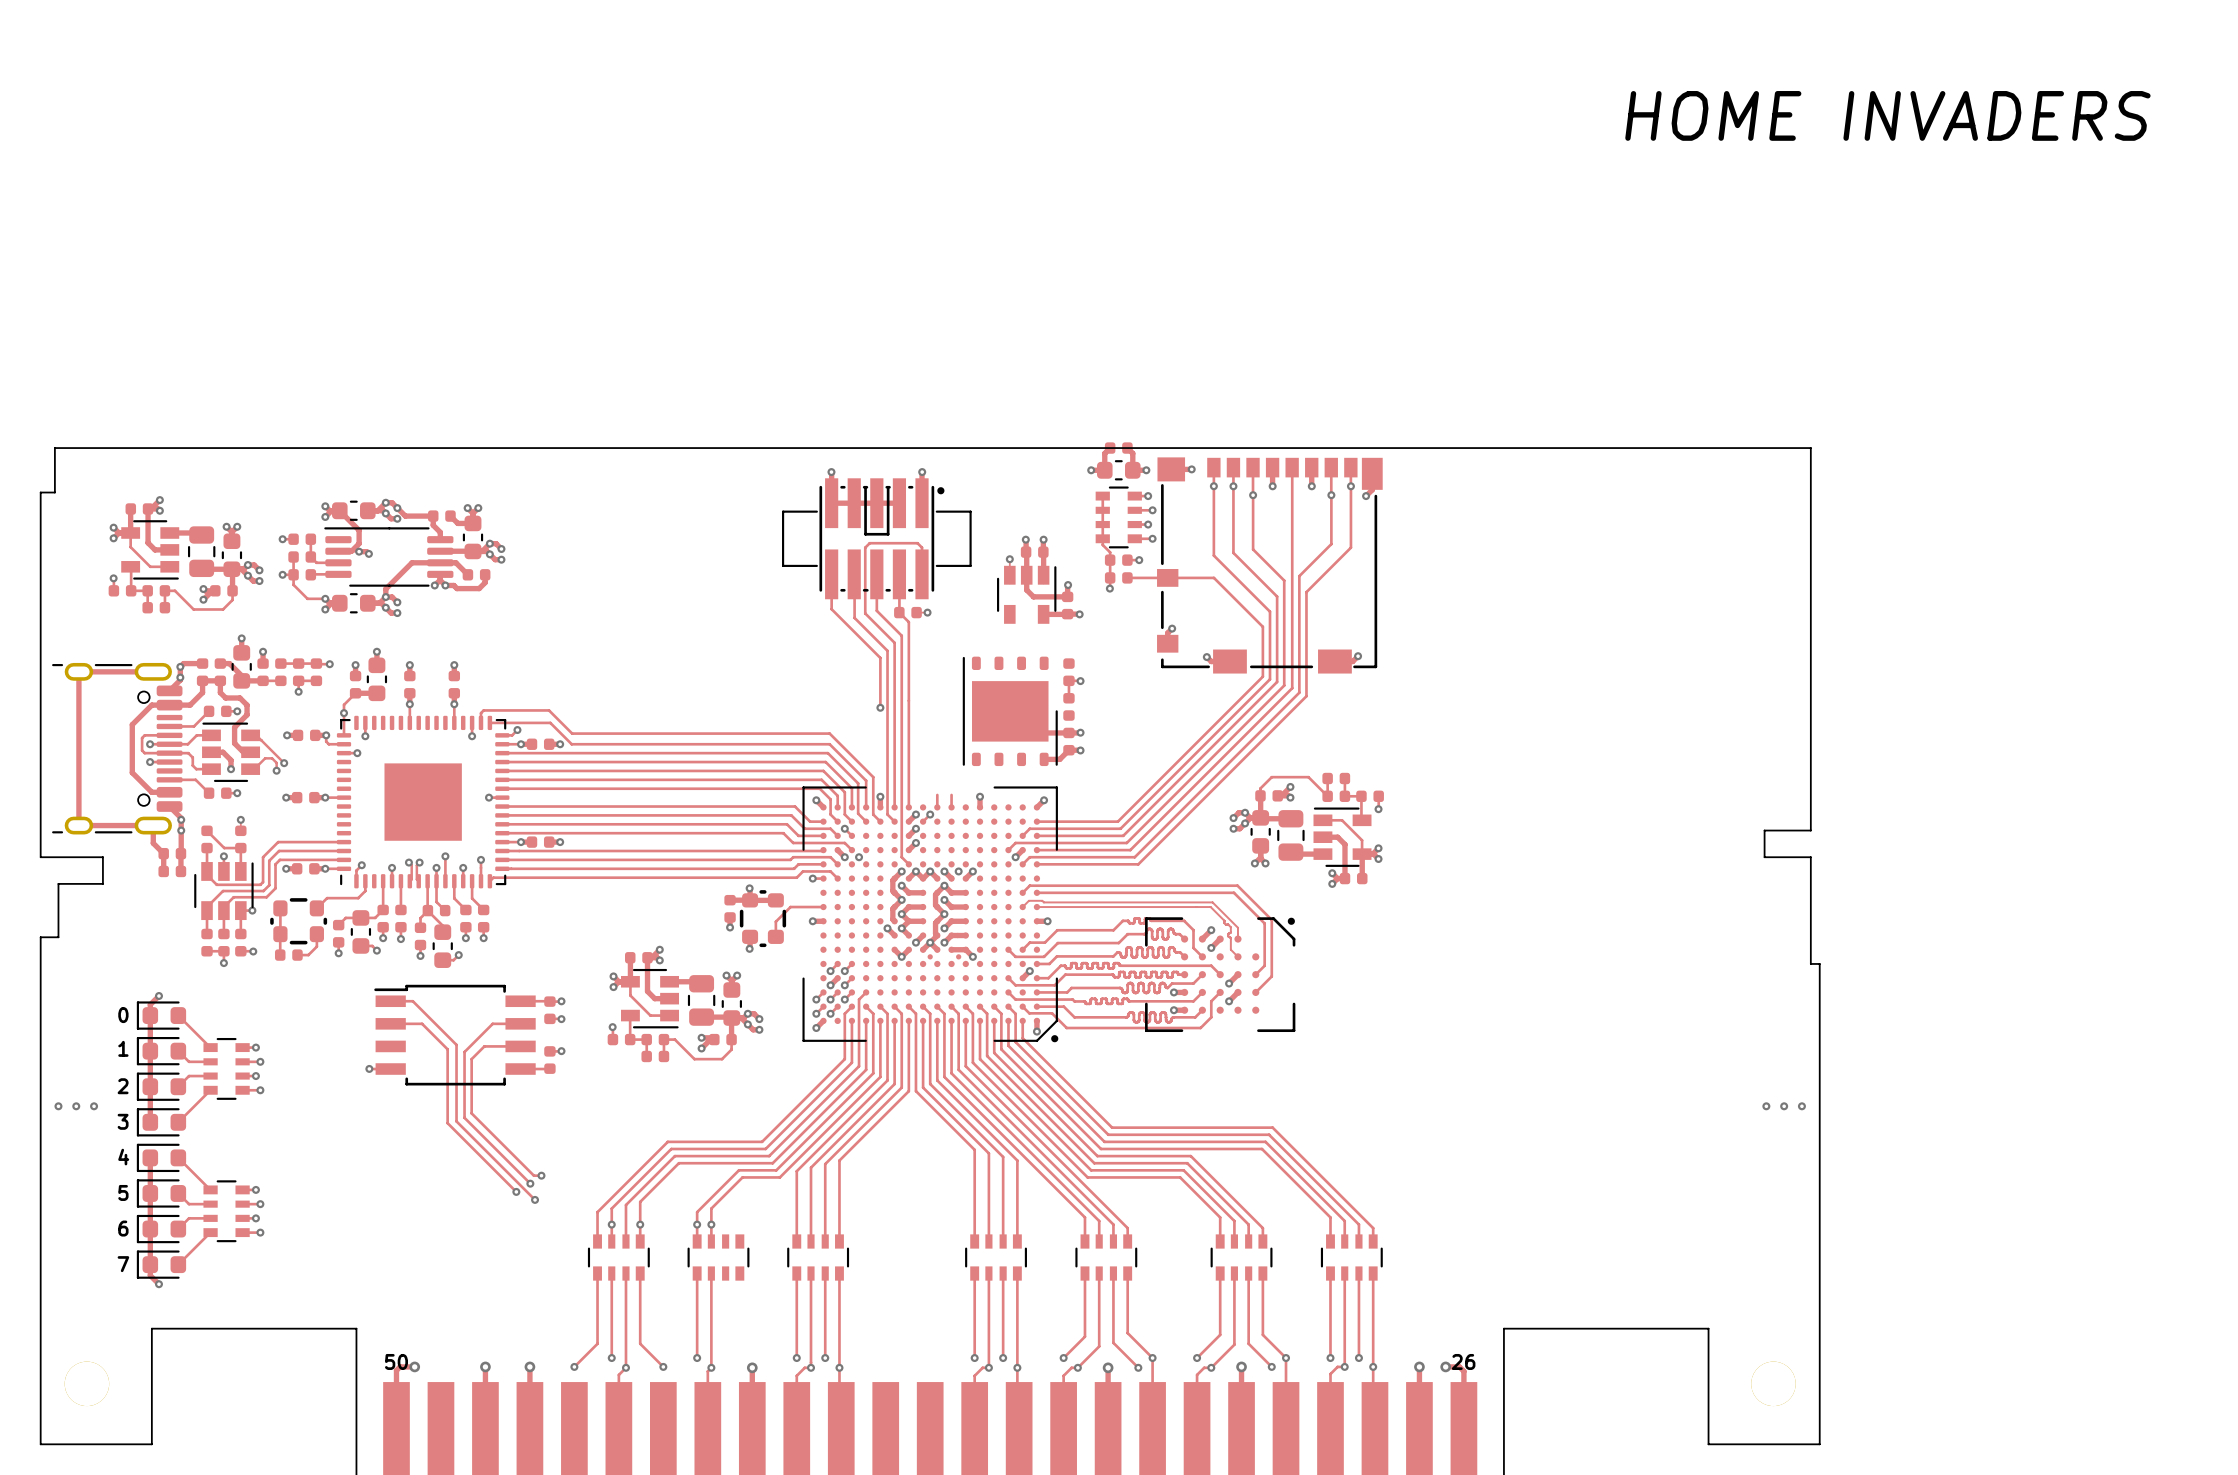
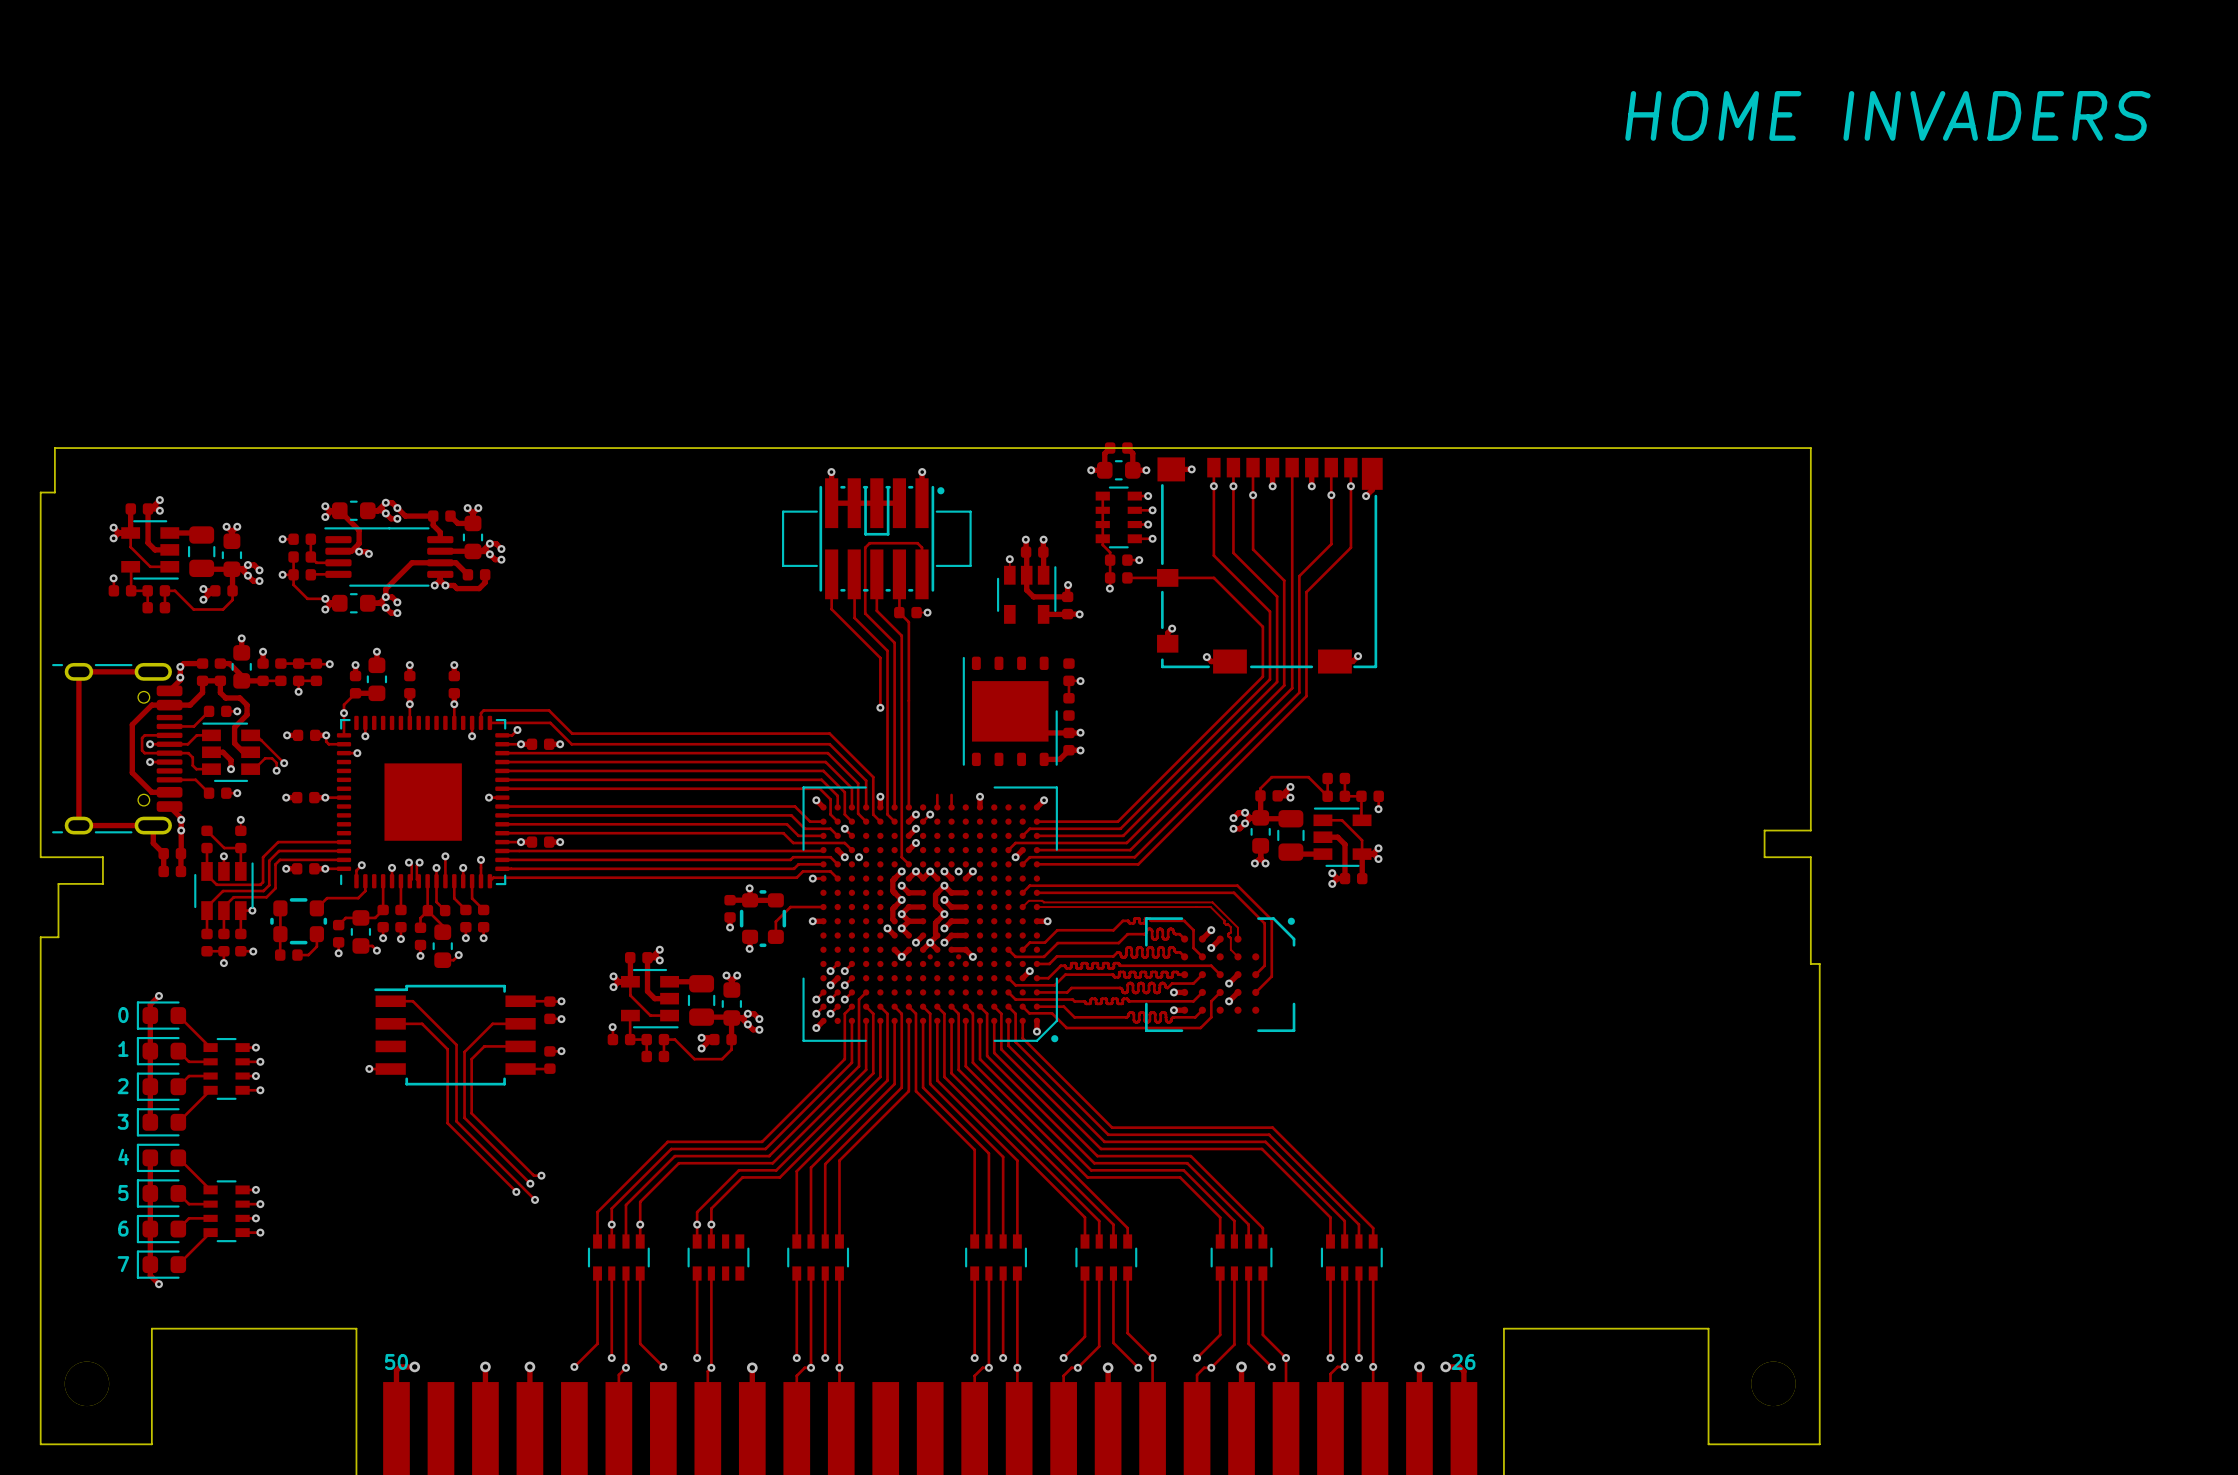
via: (58, 1106) -> none
via: (76, 1106) -> none
via: (94, 1106) -> none
via: (1766, 1106) -> none
via: (1784, 1106) -> none
via: (1801, 1106) -> none

